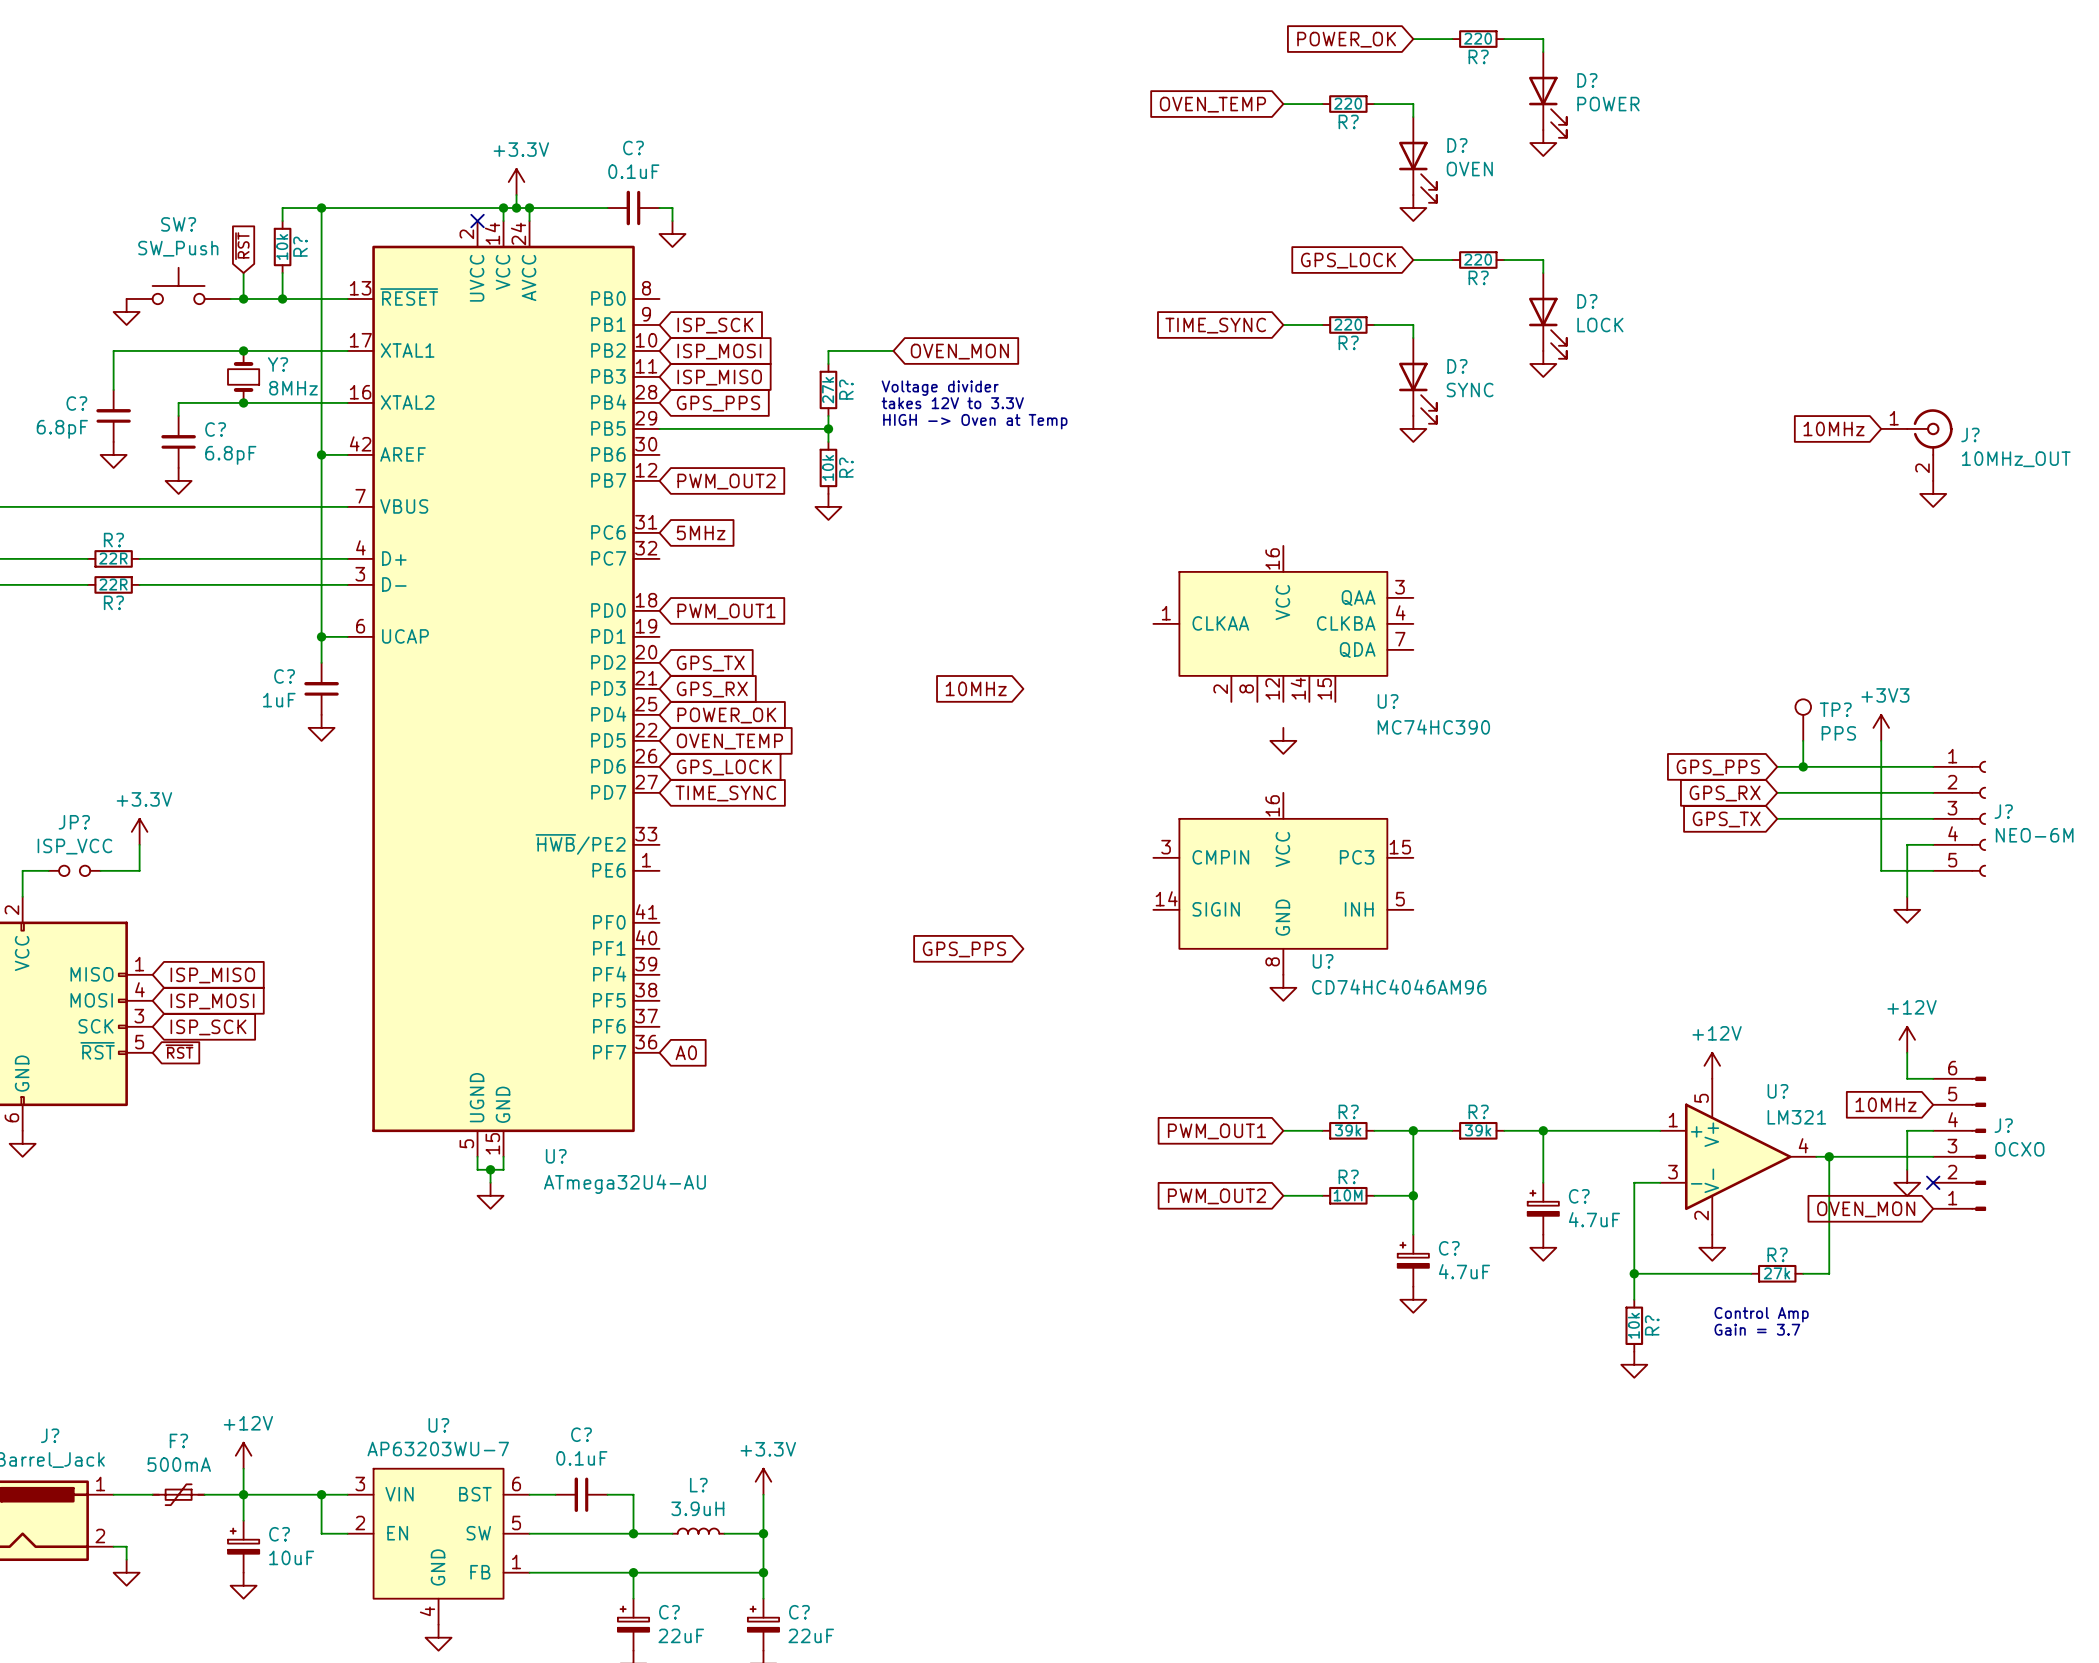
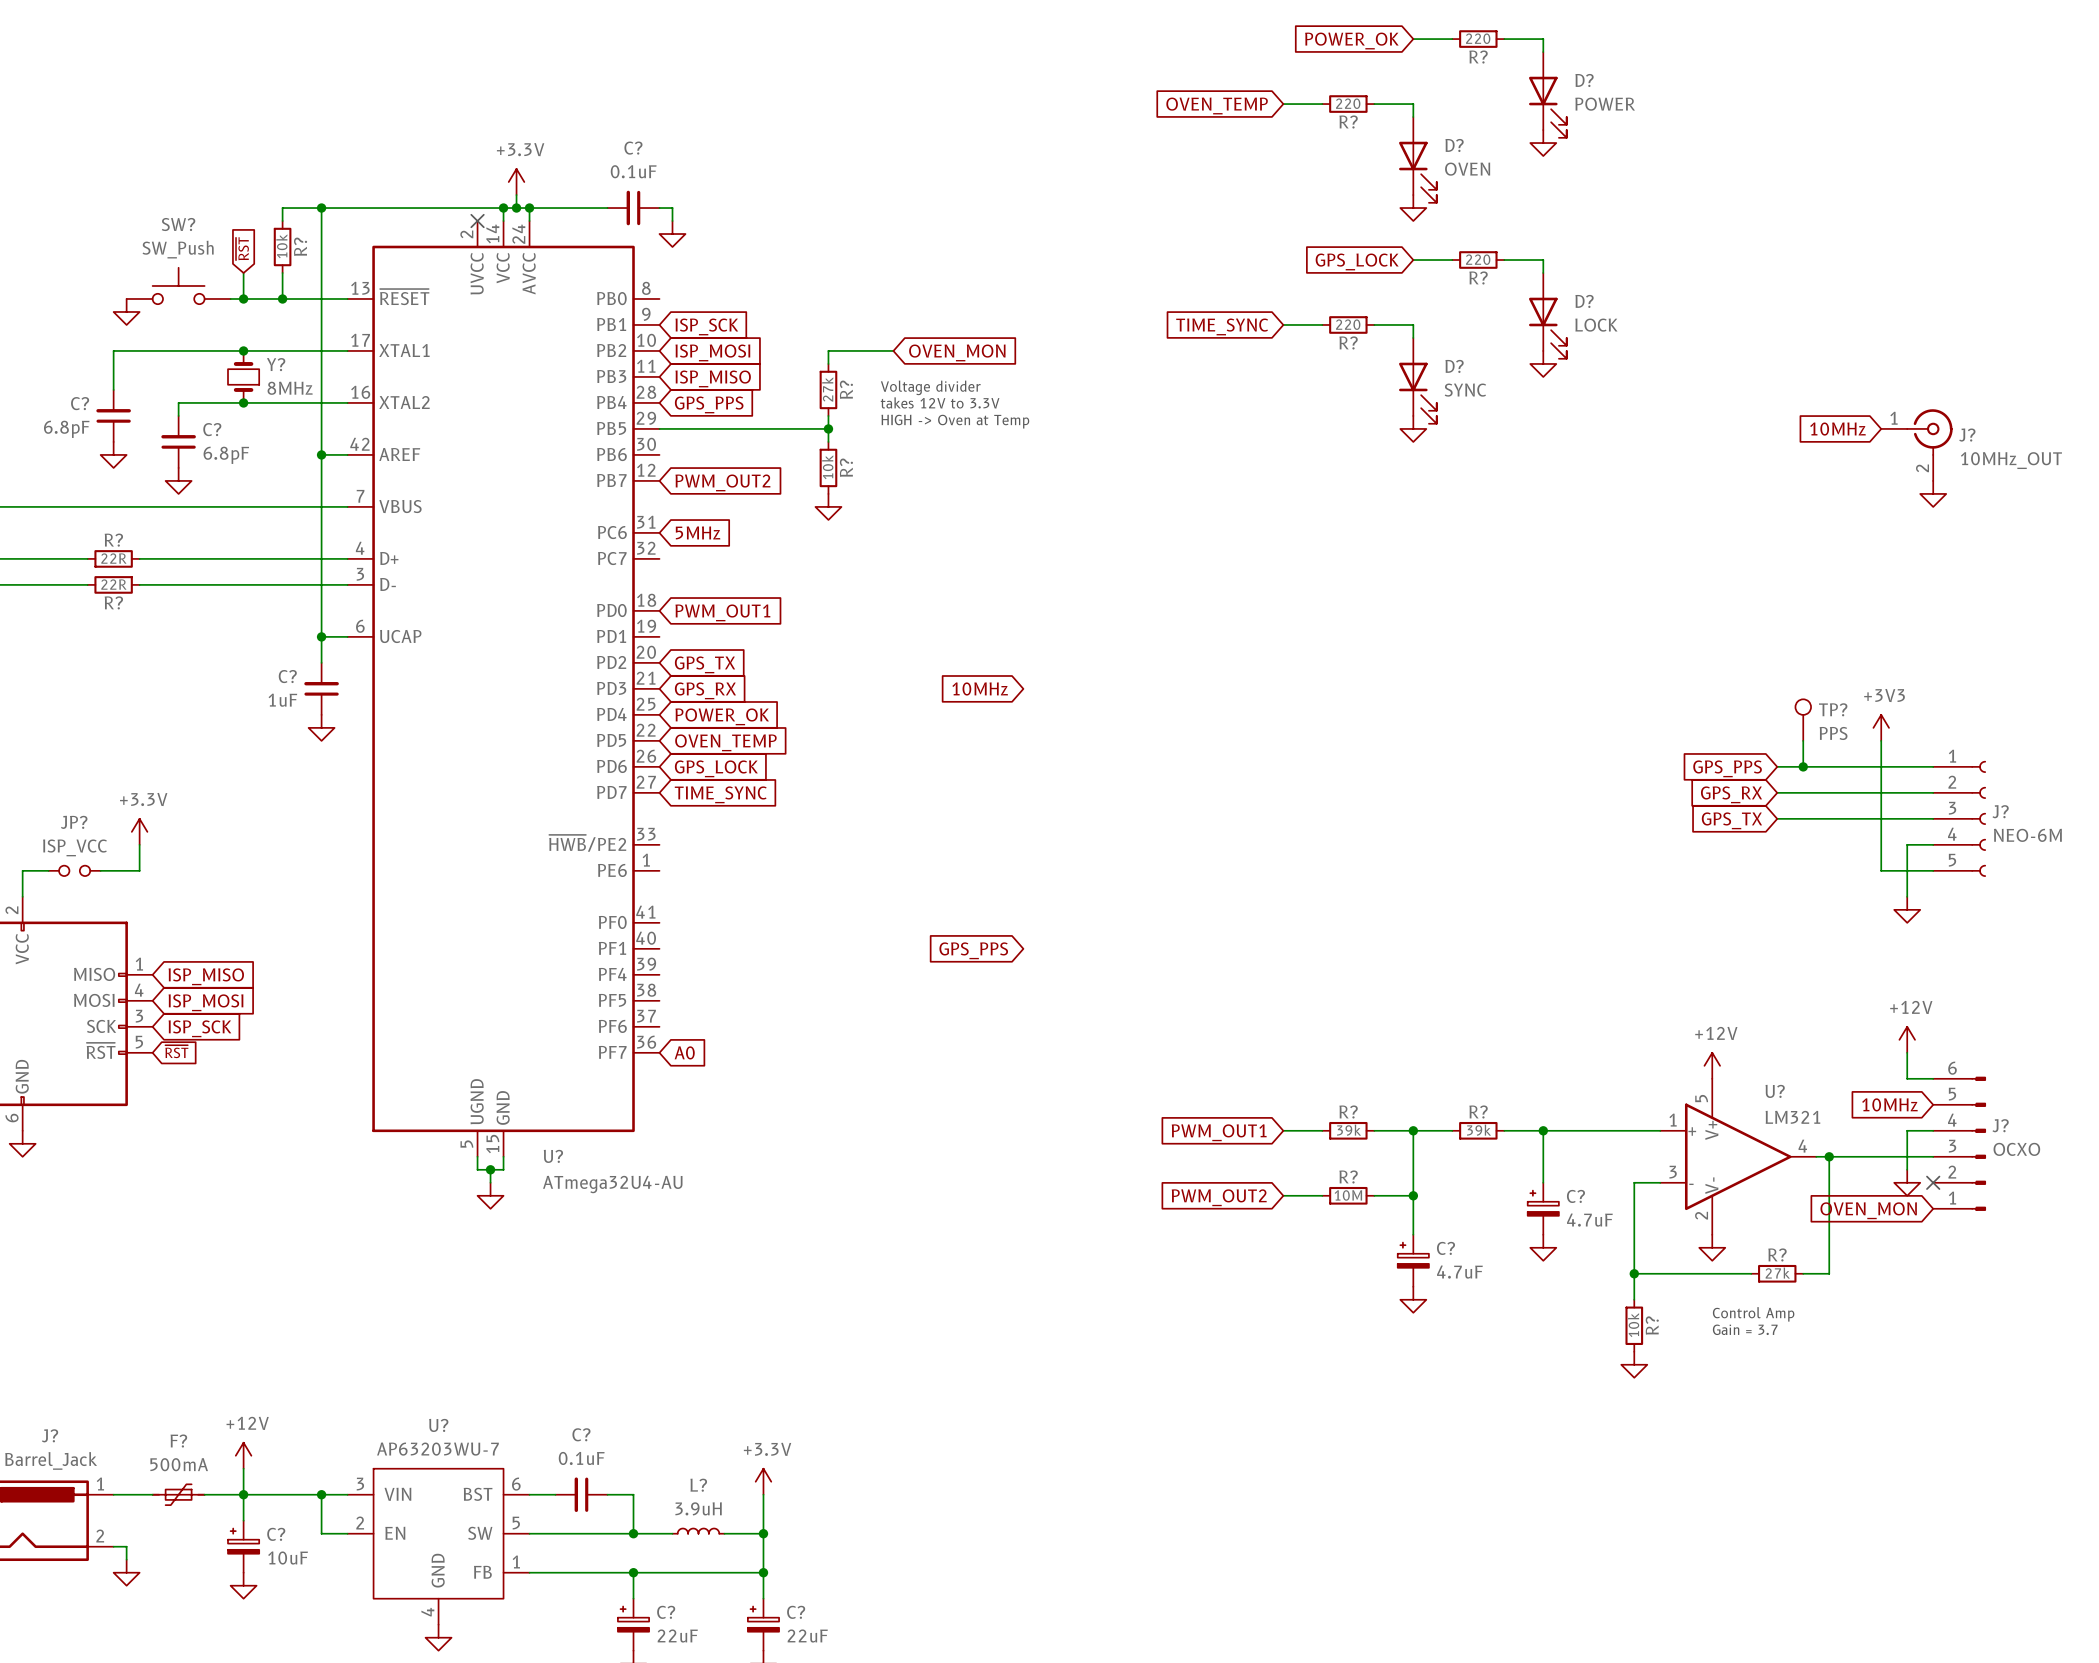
U?: MC74HC390 (1283, 623) -> none
power symbol: (1283, 740) -> none
U?: CD74HC4046AM96 (1283, 883) -> none
power symbol: (1283, 987) -> none

